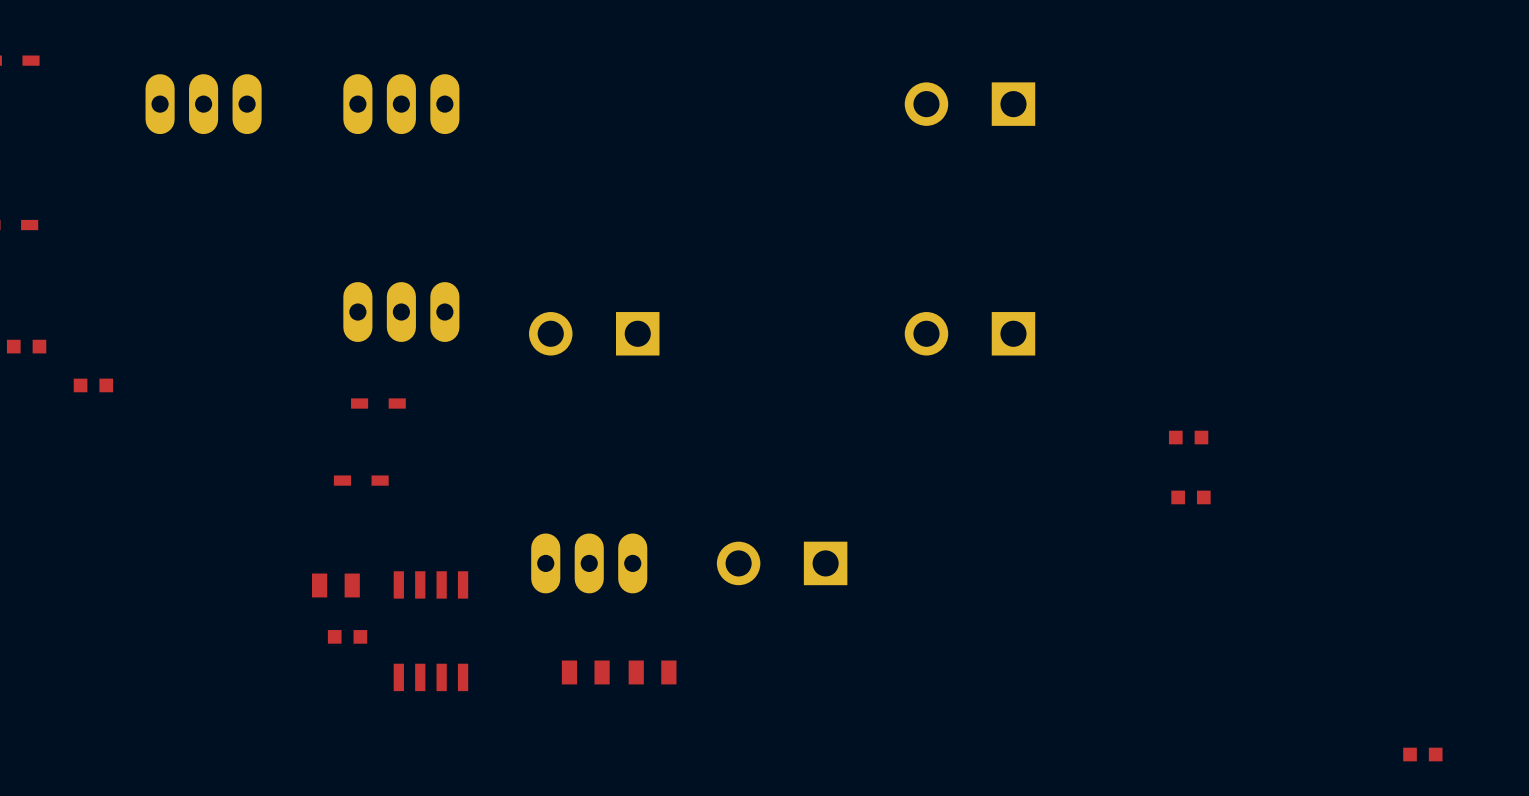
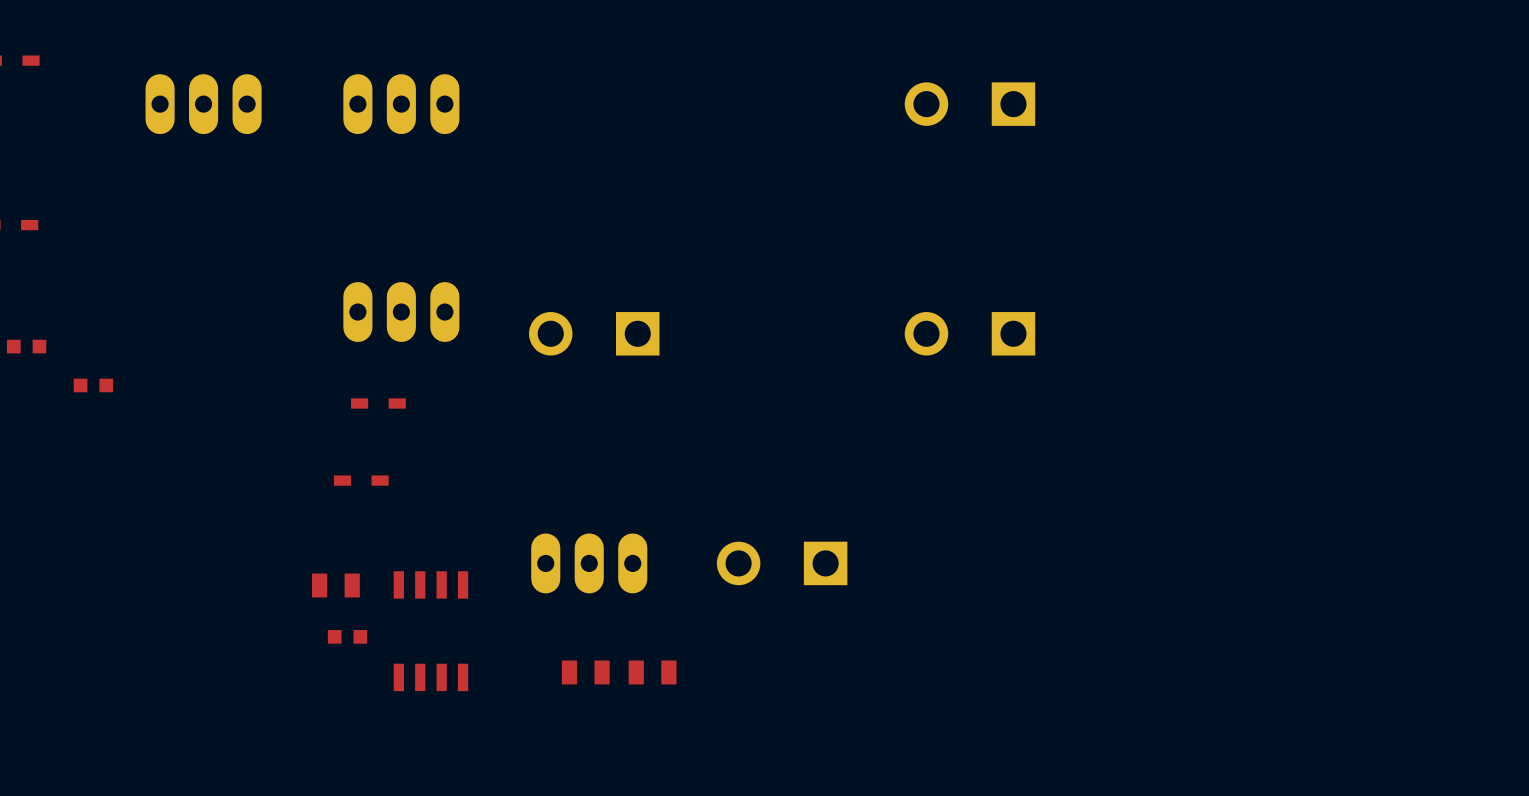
part: (1188, 437) -> none
part: (1190, 497) -> none
part: (1422, 754) -> none

